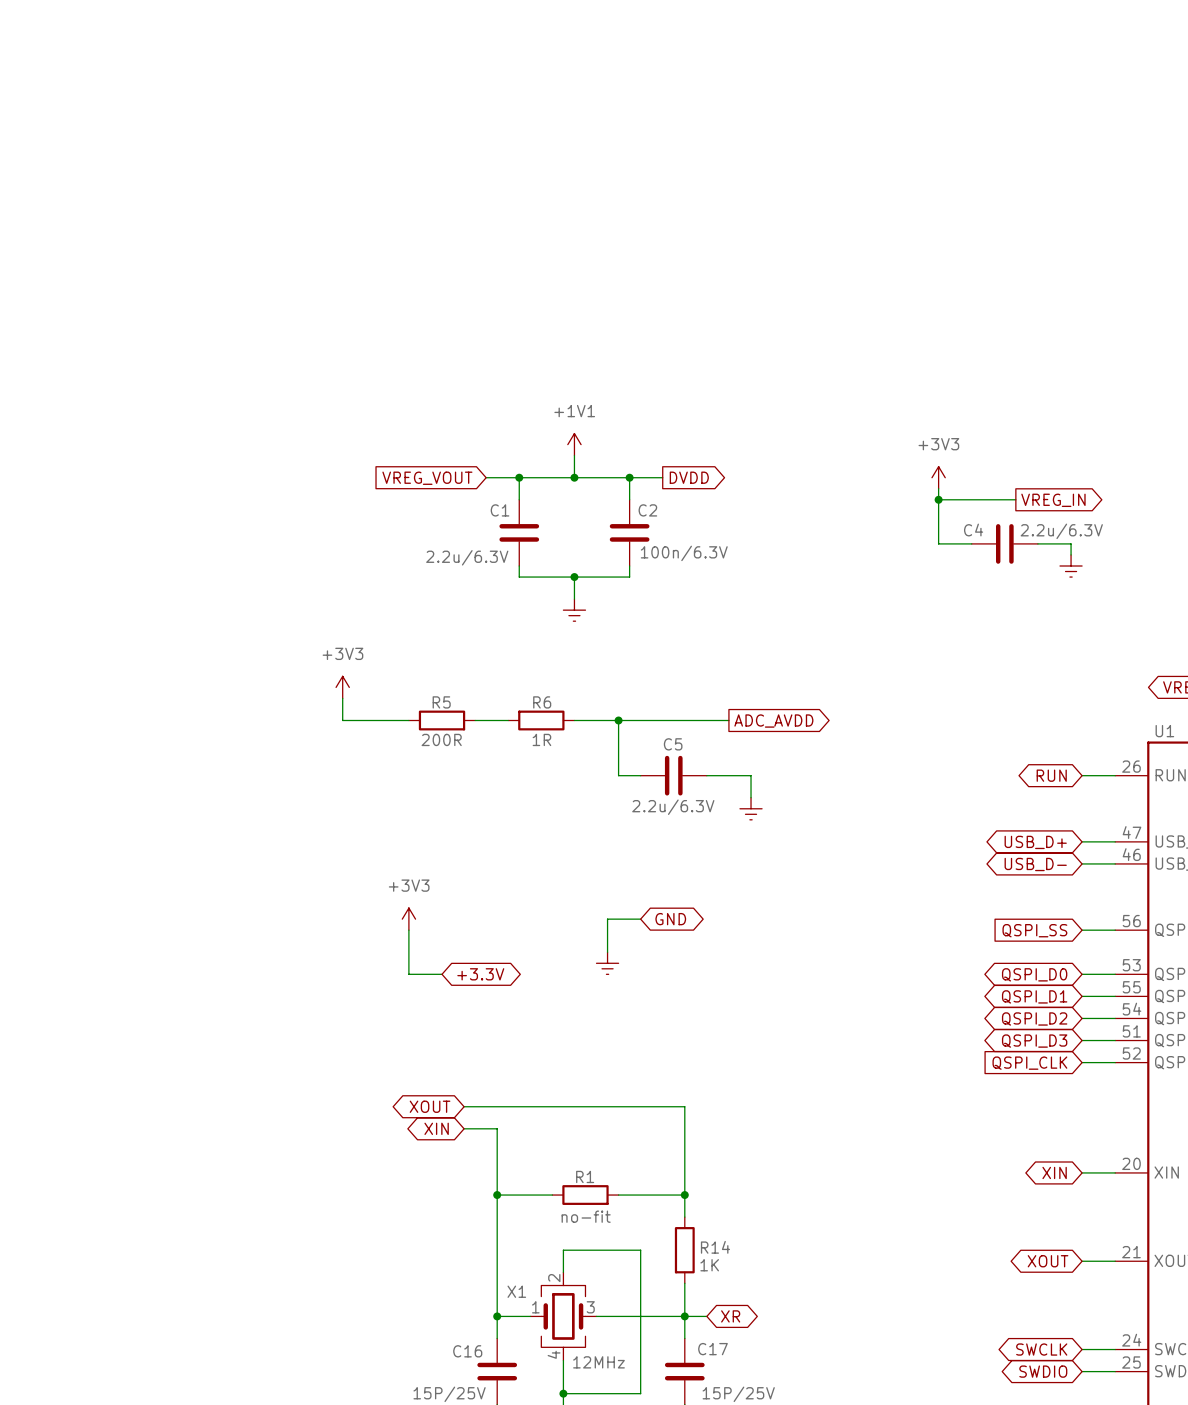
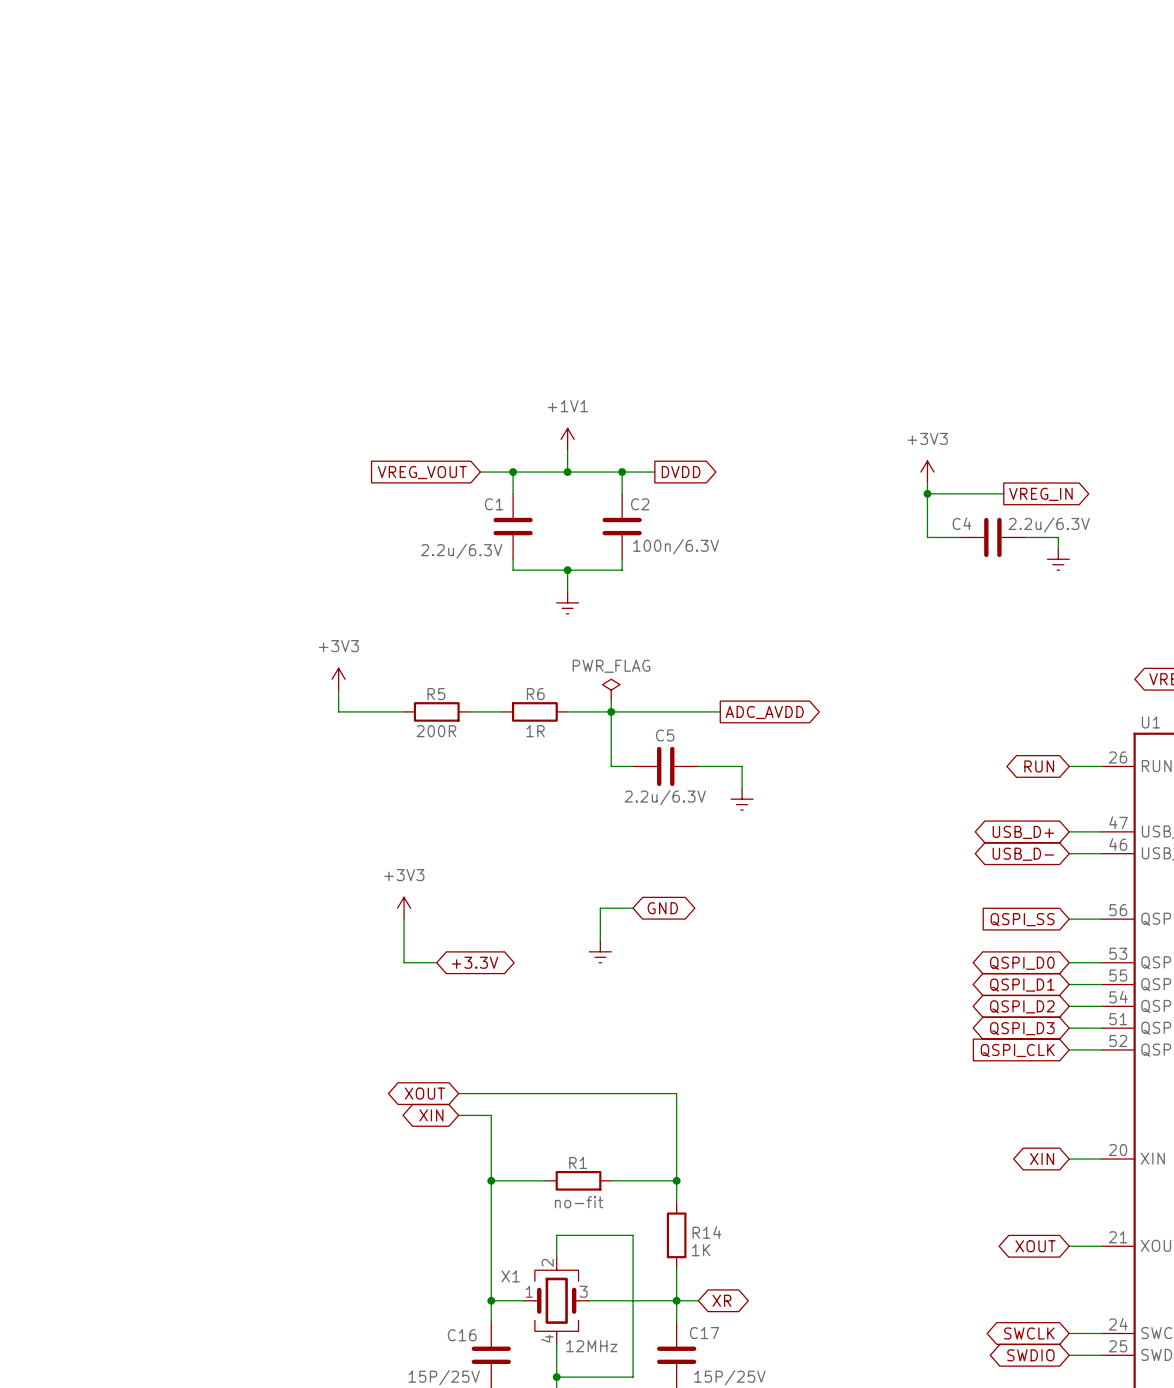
power symbol: none -> PWR_FLAG (611, 690)
wire: none -> (611, 701) (611, 711)

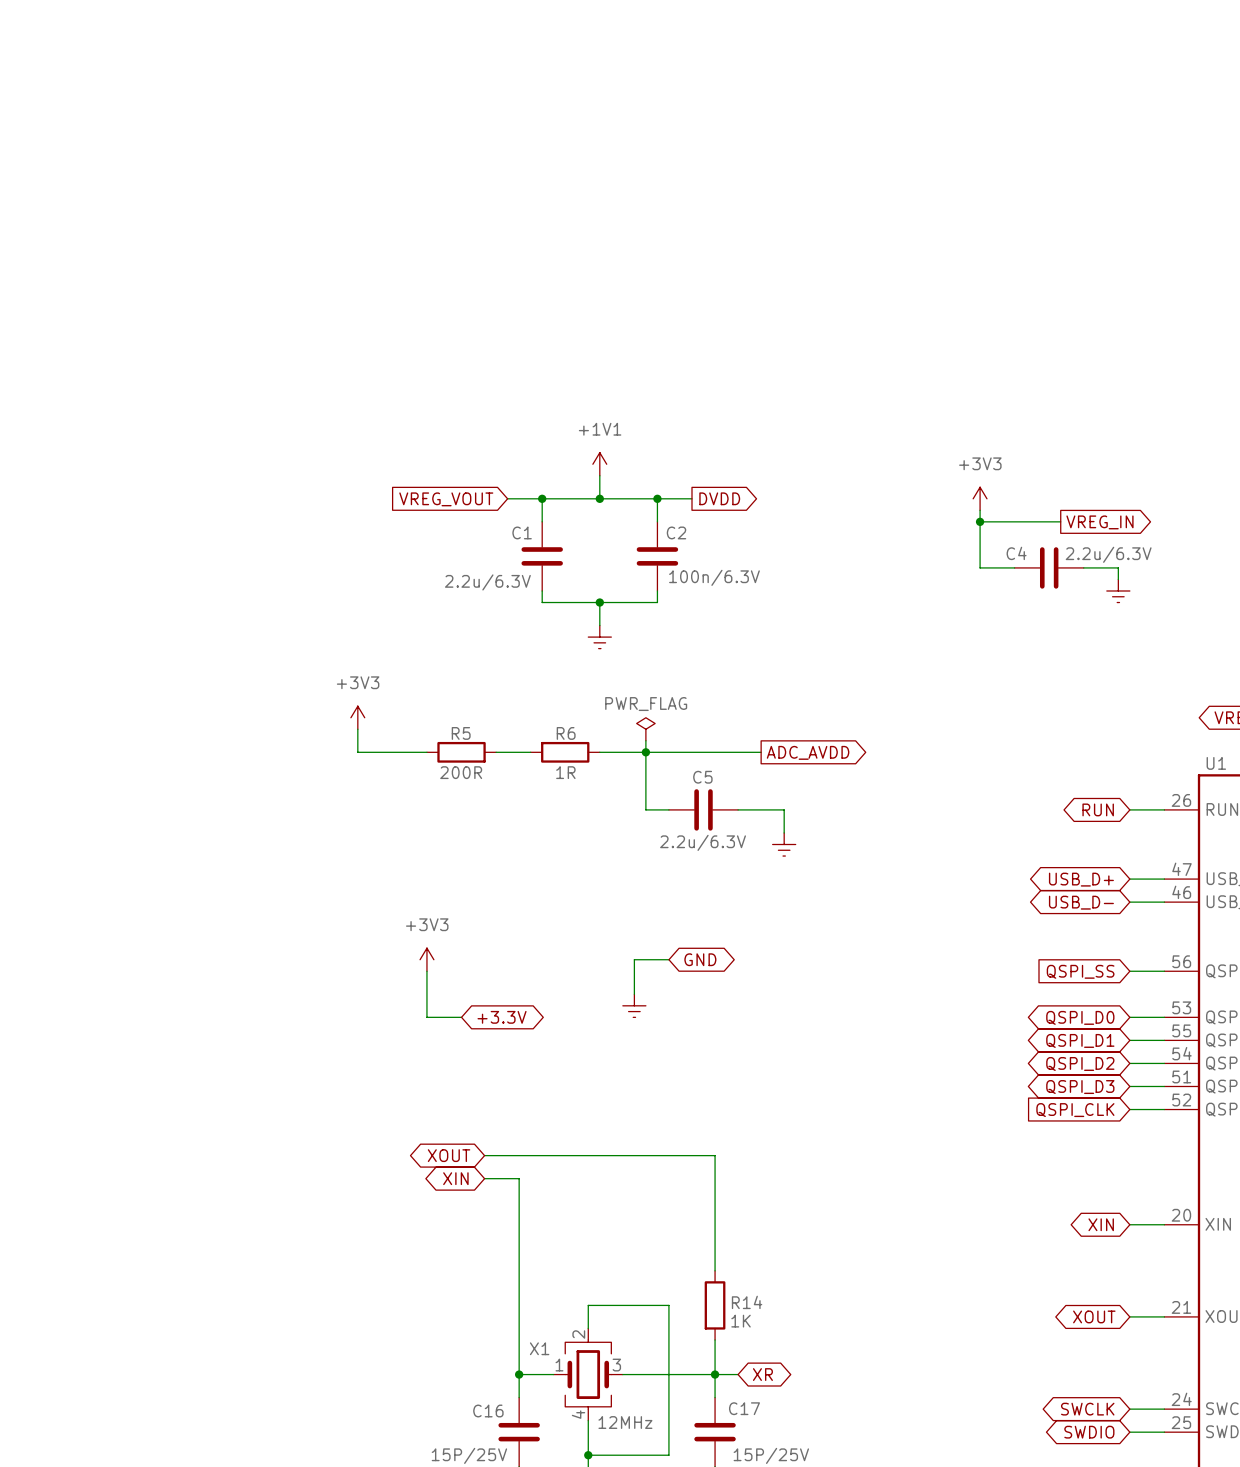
wire: (491, 1180) (545, 1180) -> none
junction: (491, 1180) -> none
R1: no-fit (578, 1180) -> none
wire: (611, 1180) (676, 1180) -> none
junction: (676, 1180) -> none

